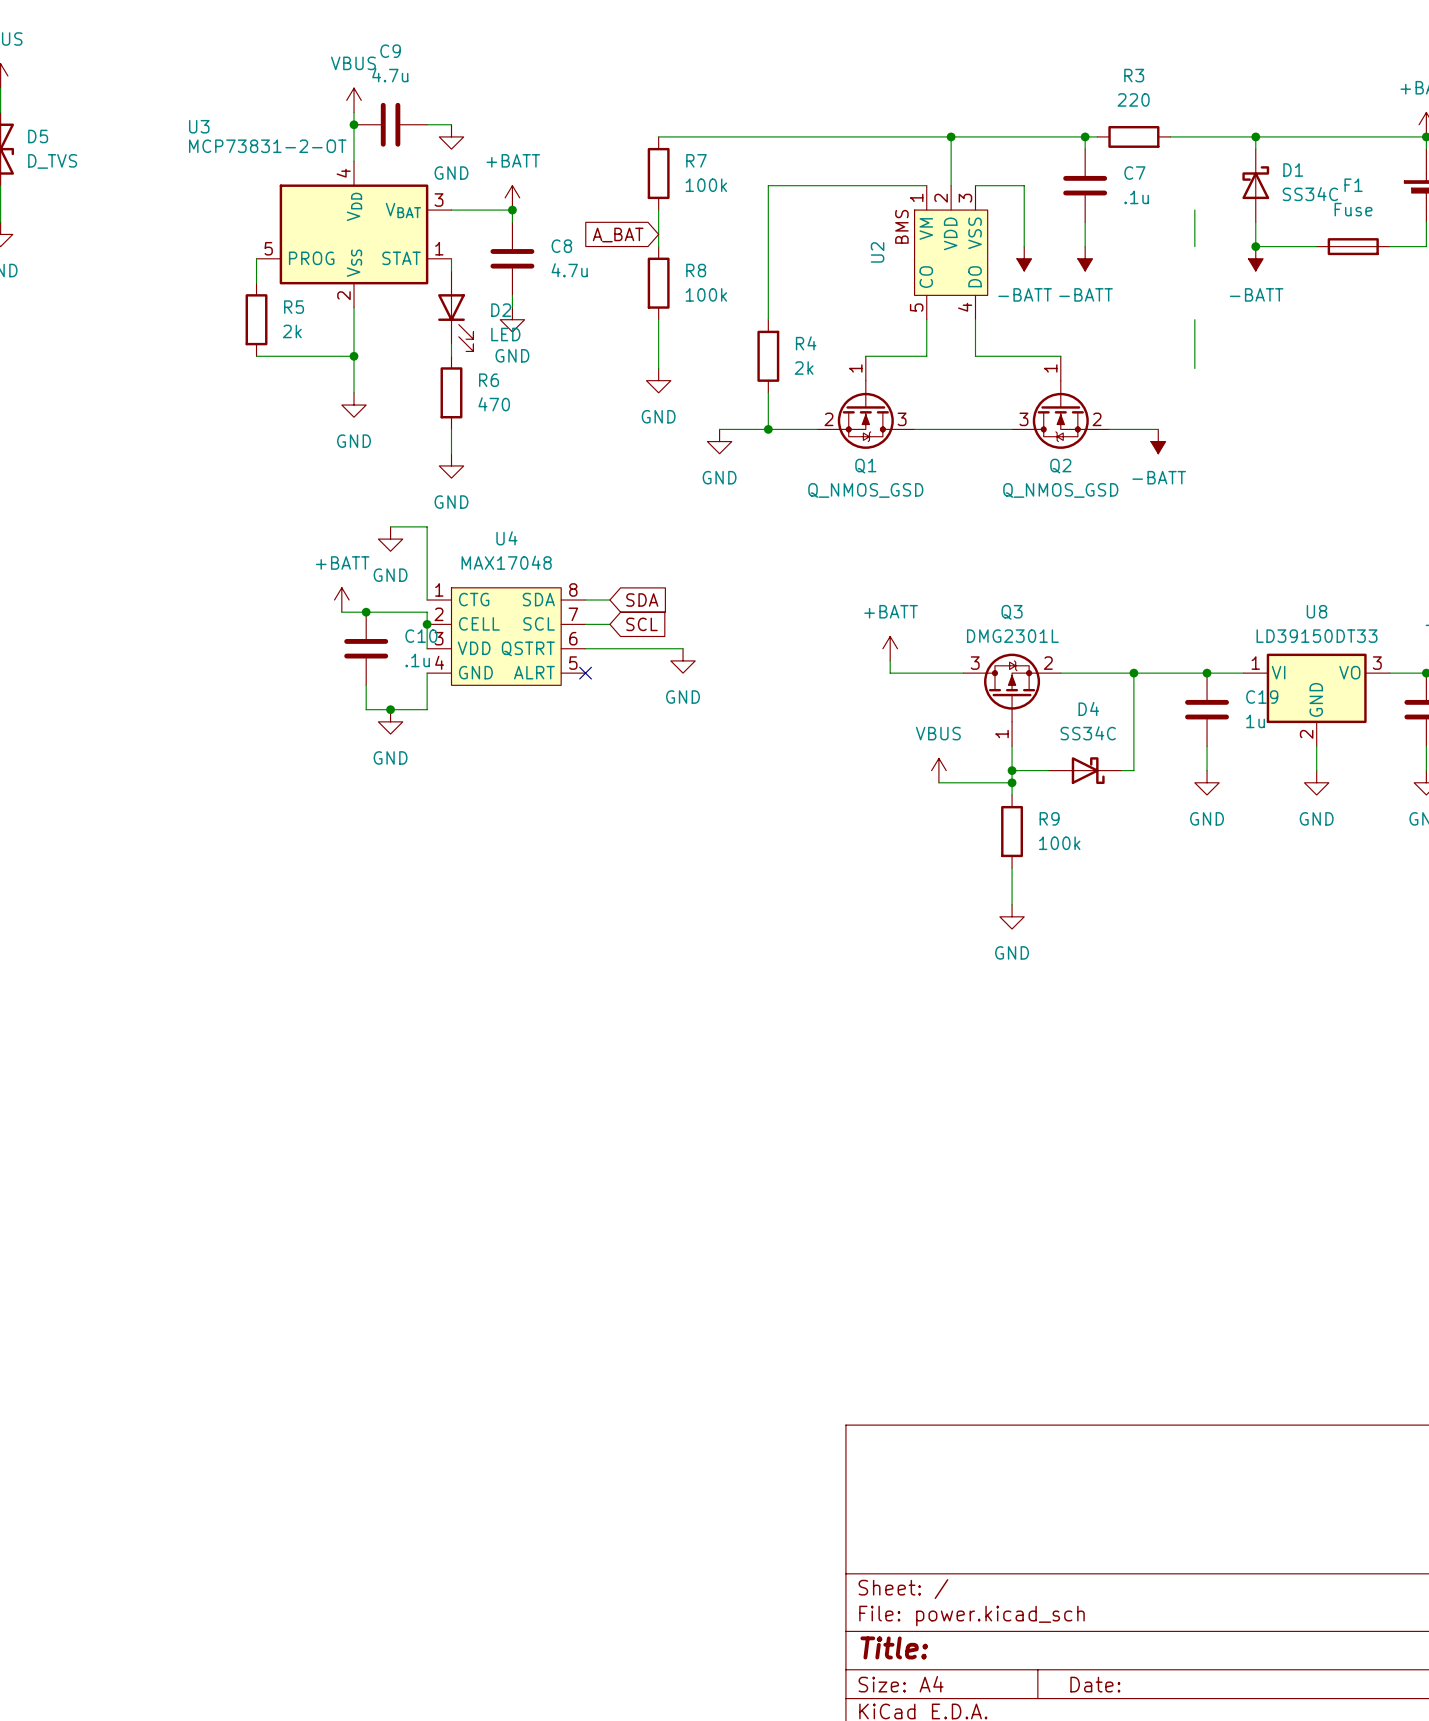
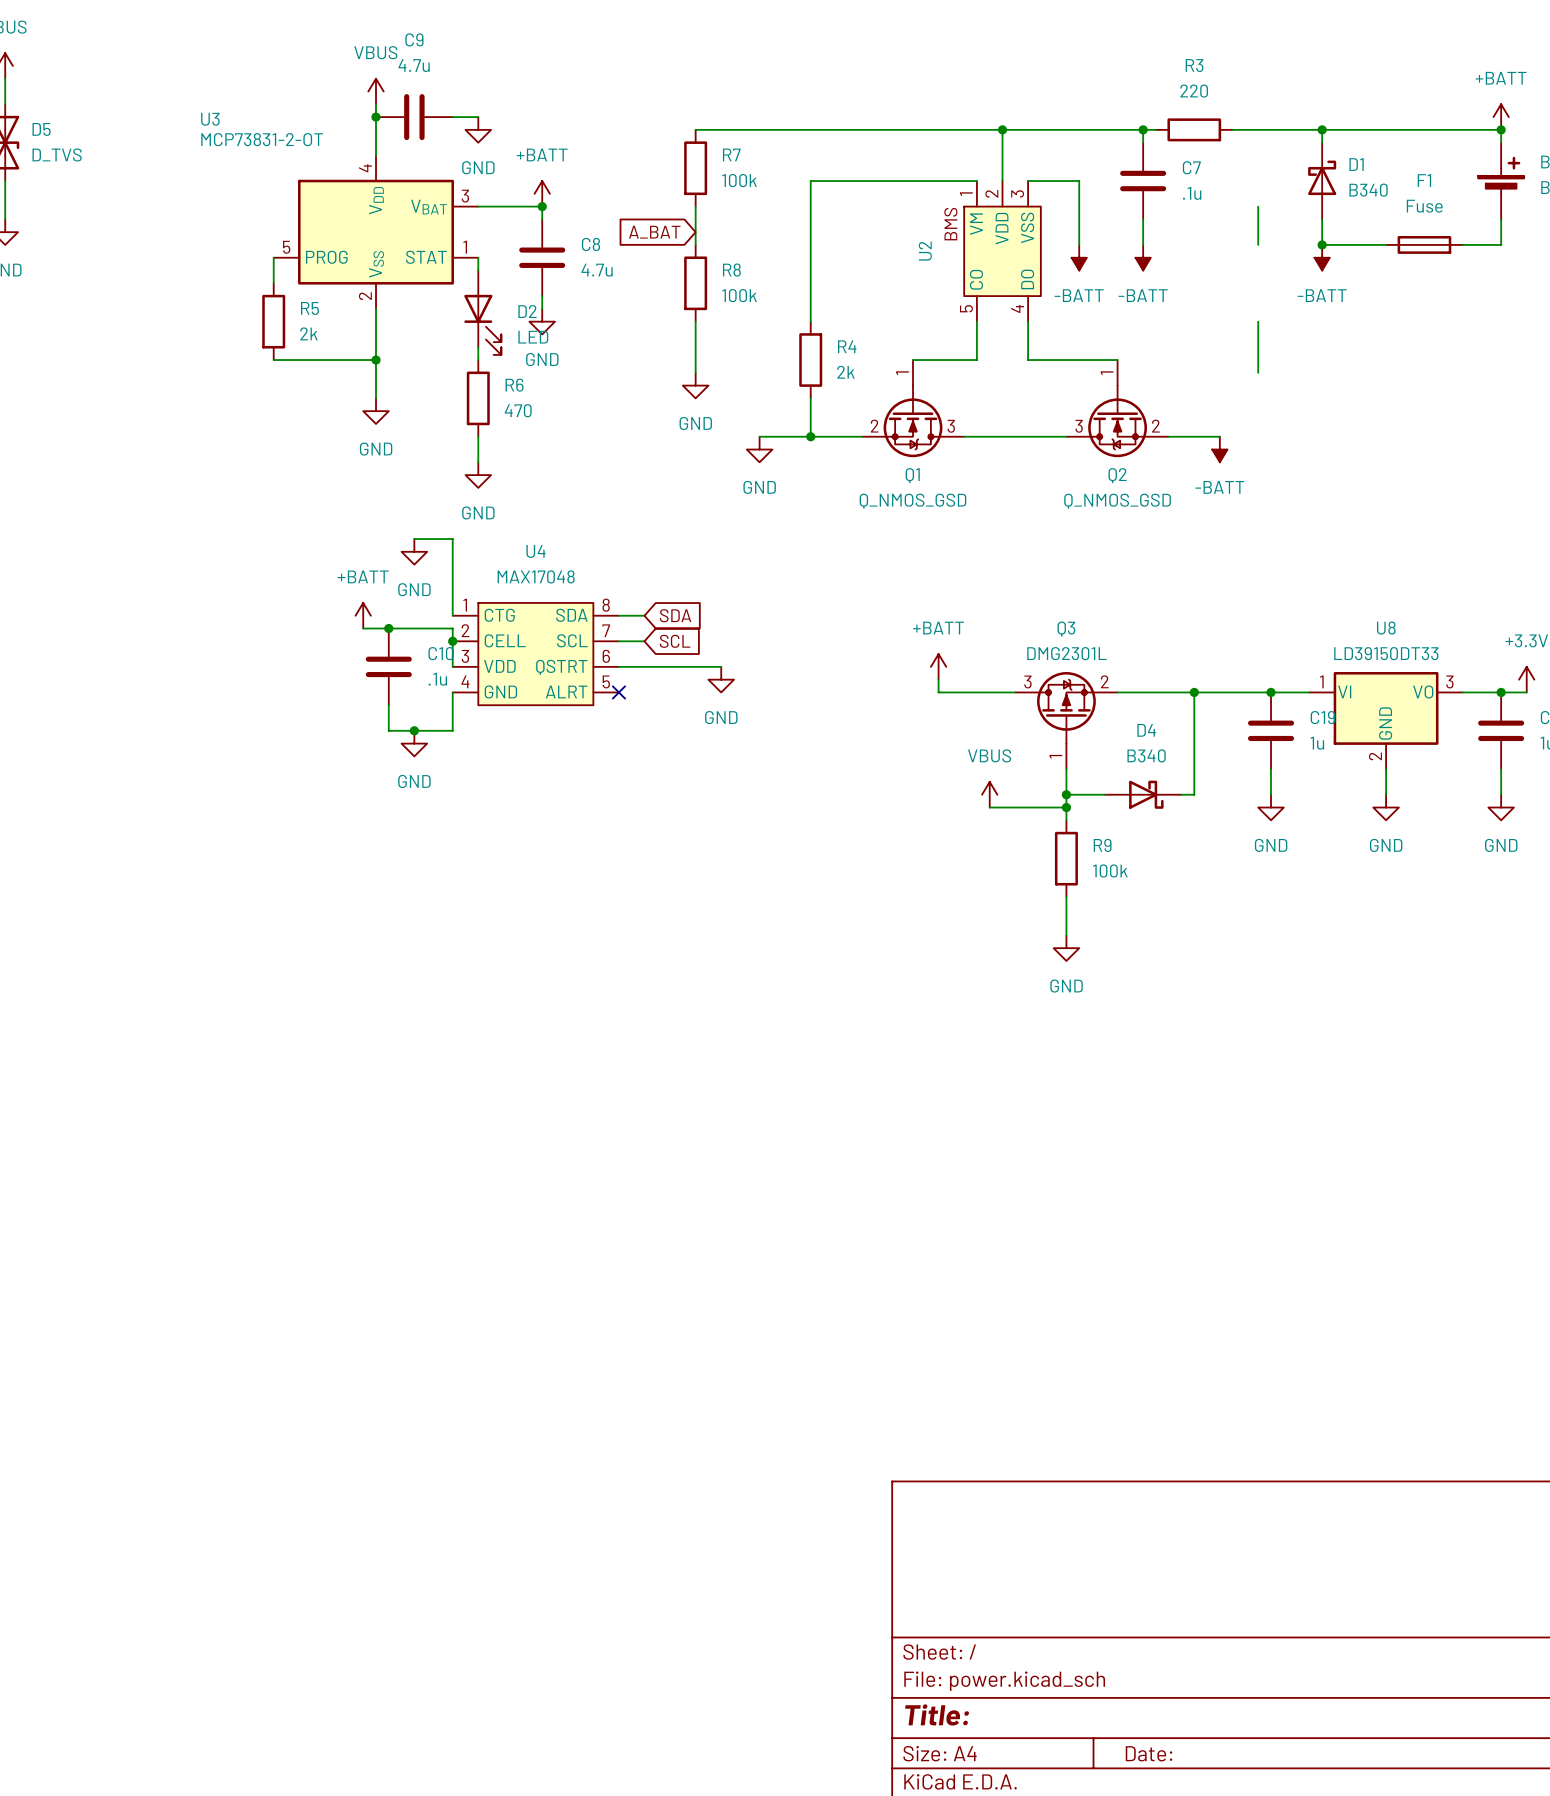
D1 value: SS34C (1310, 194) -> B340 (1368, 190)
D4 value: SS34C (1088, 733) -> B340 (1146, 755)

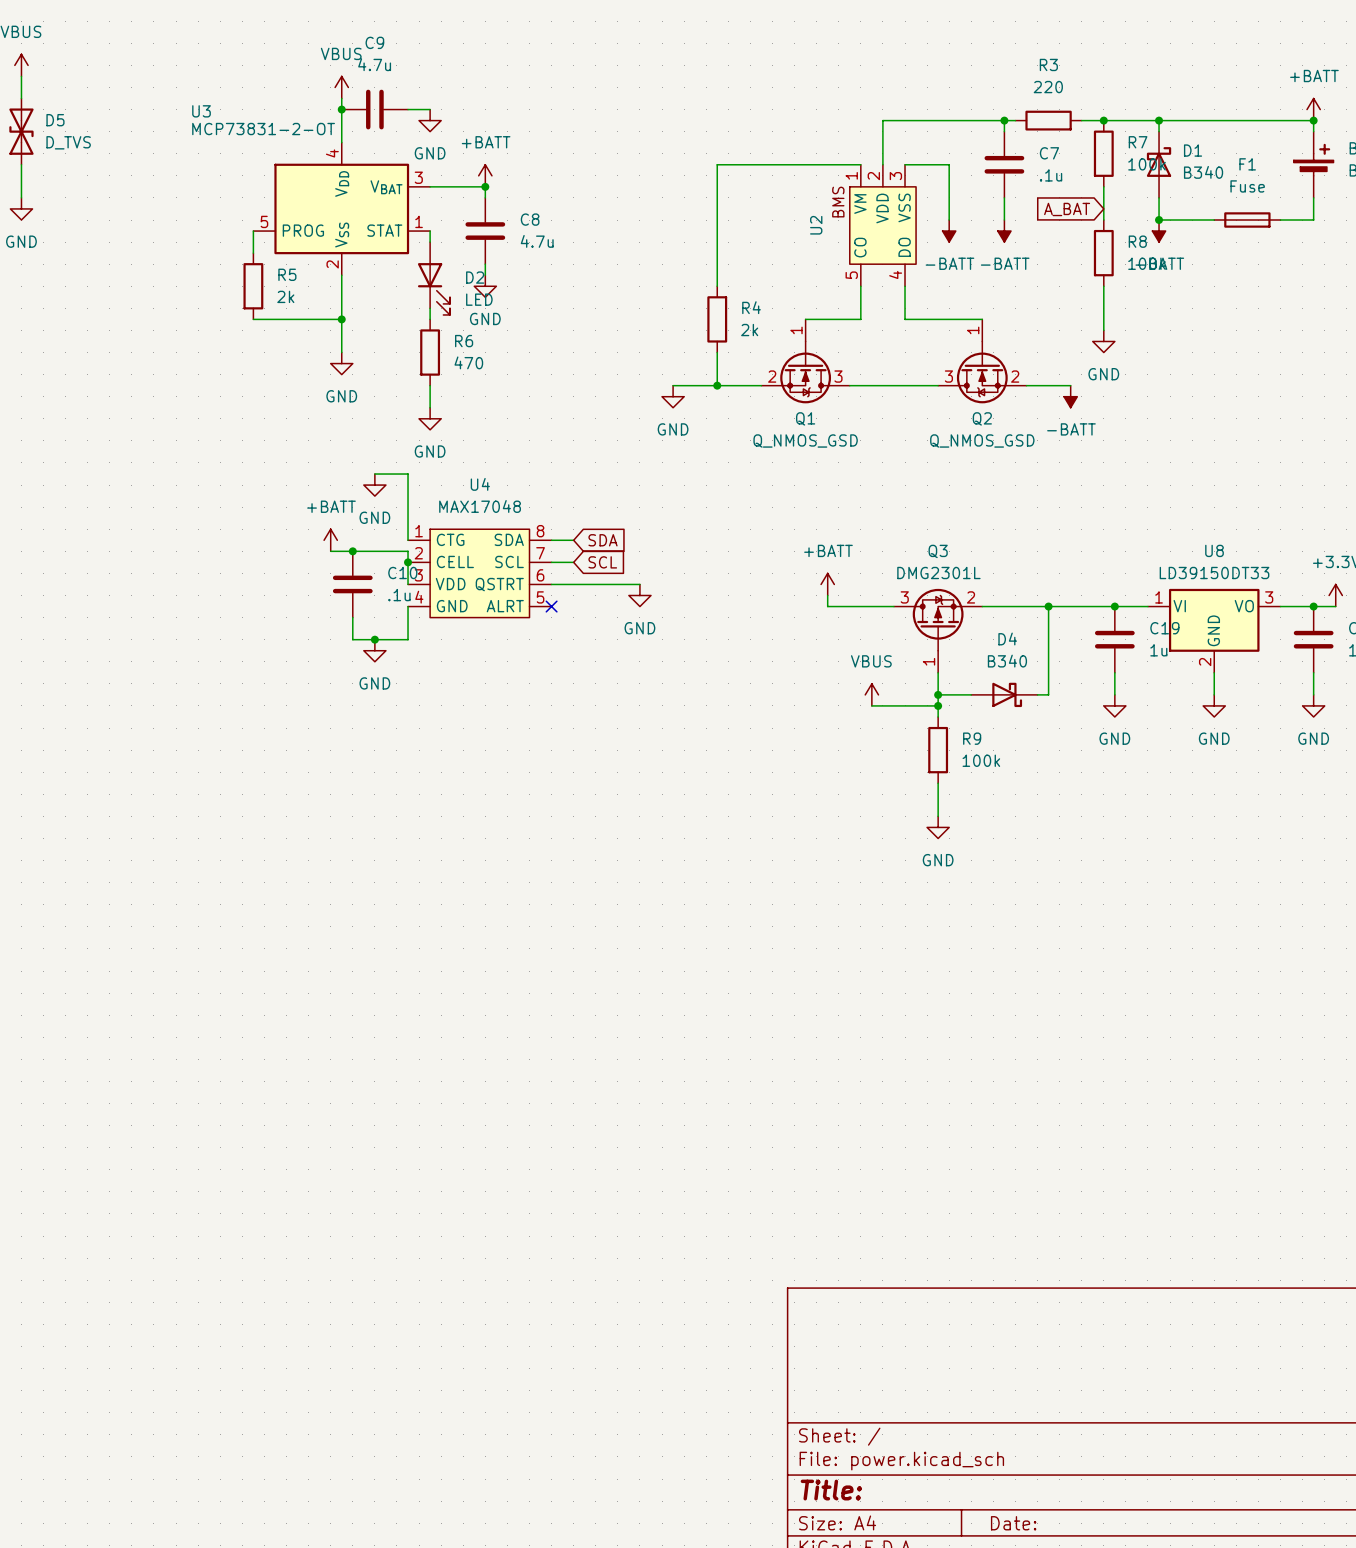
wire: (695, 129) (1002, 129) -> none
junction: (1002, 129) -> none
junction: none -> (1103, 120)
R7 position: (695, 168) -> (1103, 153)
wire: (695, 206) (695, 244) -> none
global label: A_BAT (654, 232) -> none
global label: none -> A_BAT (1067, 209)
R8 position: (695, 283) -> (1103, 253)
wire: (695, 321) (695, 372) -> none
power symbol: GND (695, 385) -> none
power symbol: none -> GND (1103, 341)

